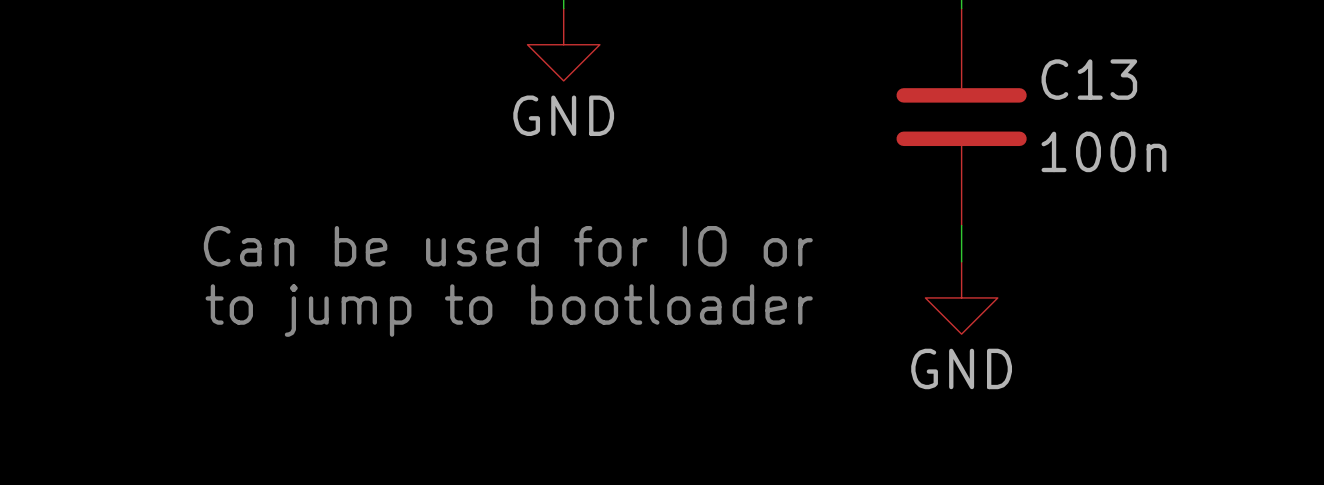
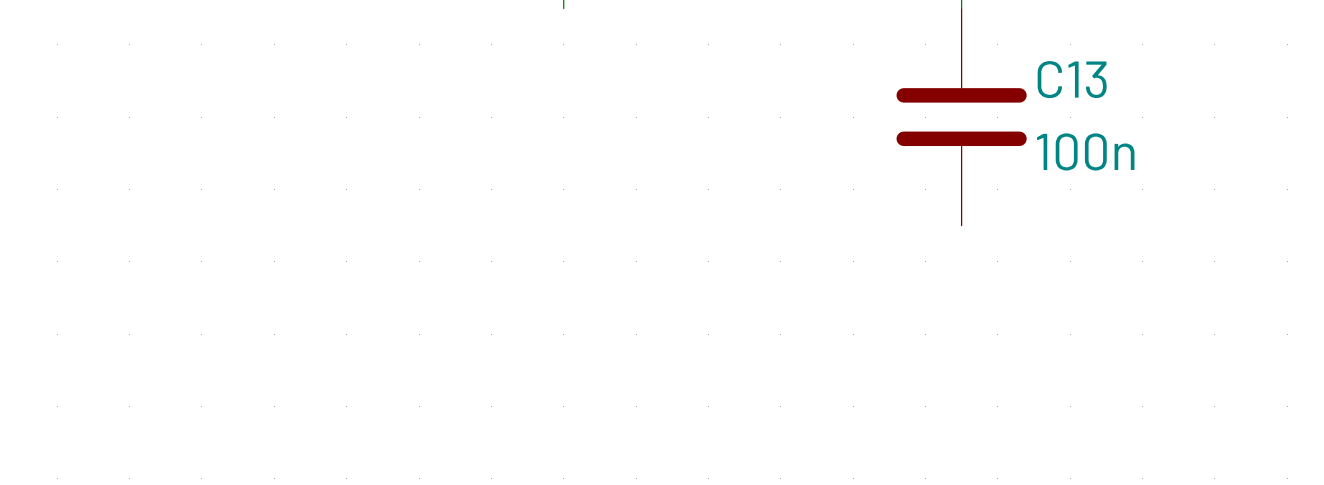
power symbol: GND (563, 44) -> none
wire: (961, 225) (961, 261) -> none
text: Can be used for IO or (508, 246) -> none
power symbol: GND (961, 297) -> none
text: to jump to bootloader (509, 310) -> none

